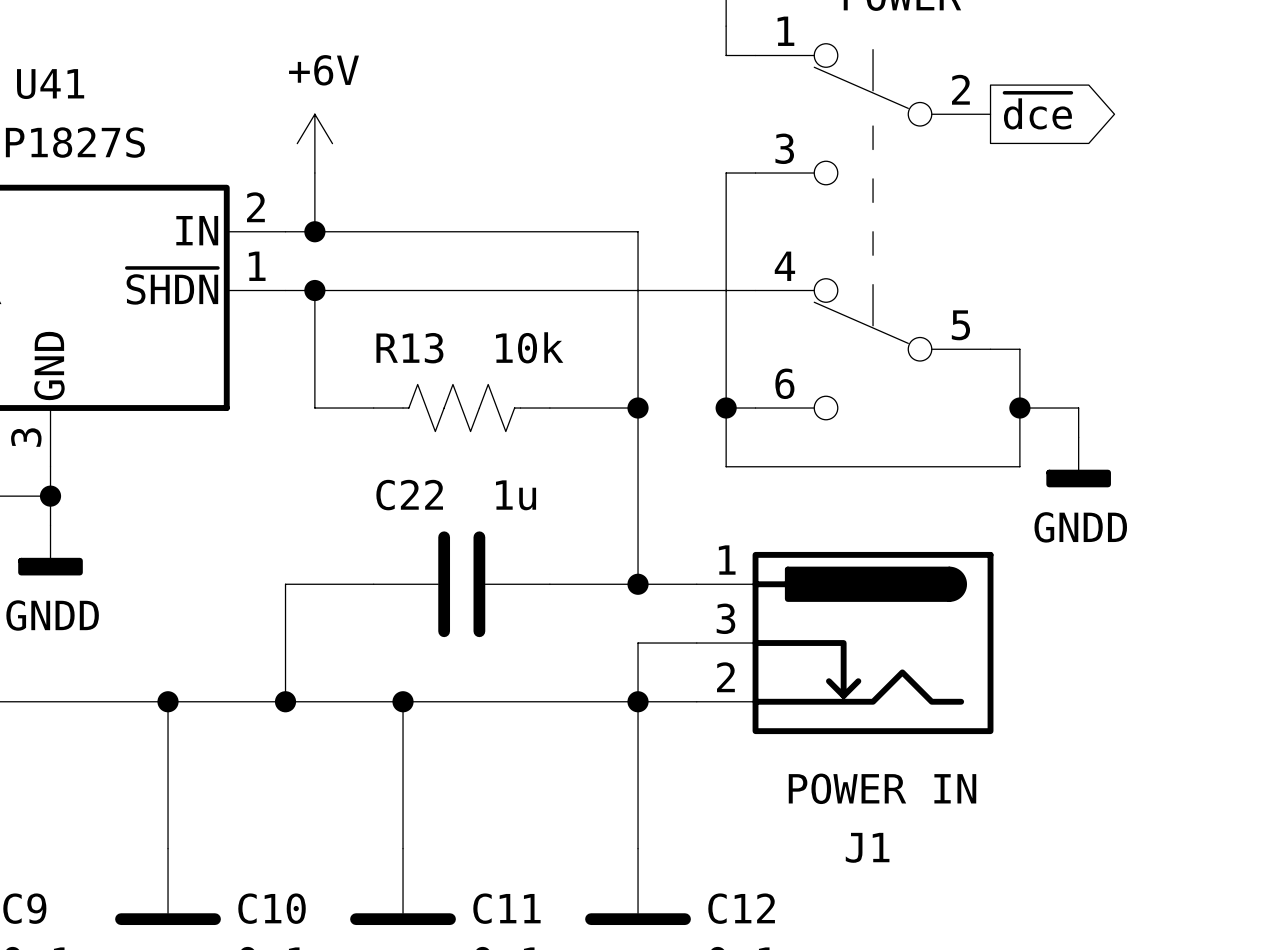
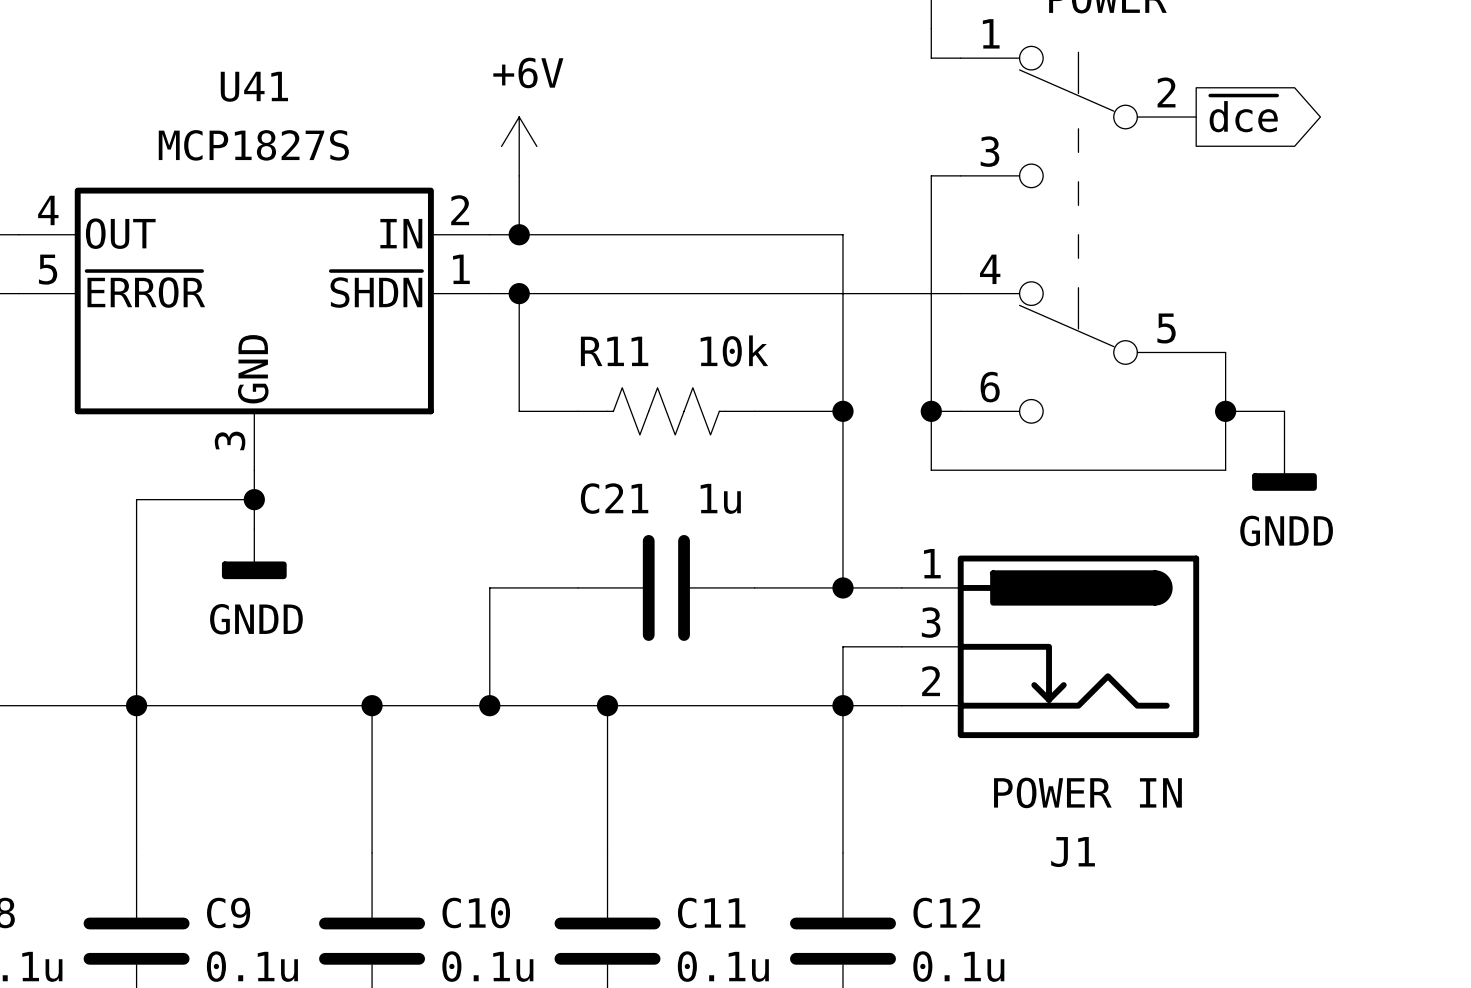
R13 name: R13 (409, 348) -> R11 (614, 351)
C22 name: C22 (409, 495) -> C21 (614, 498)

